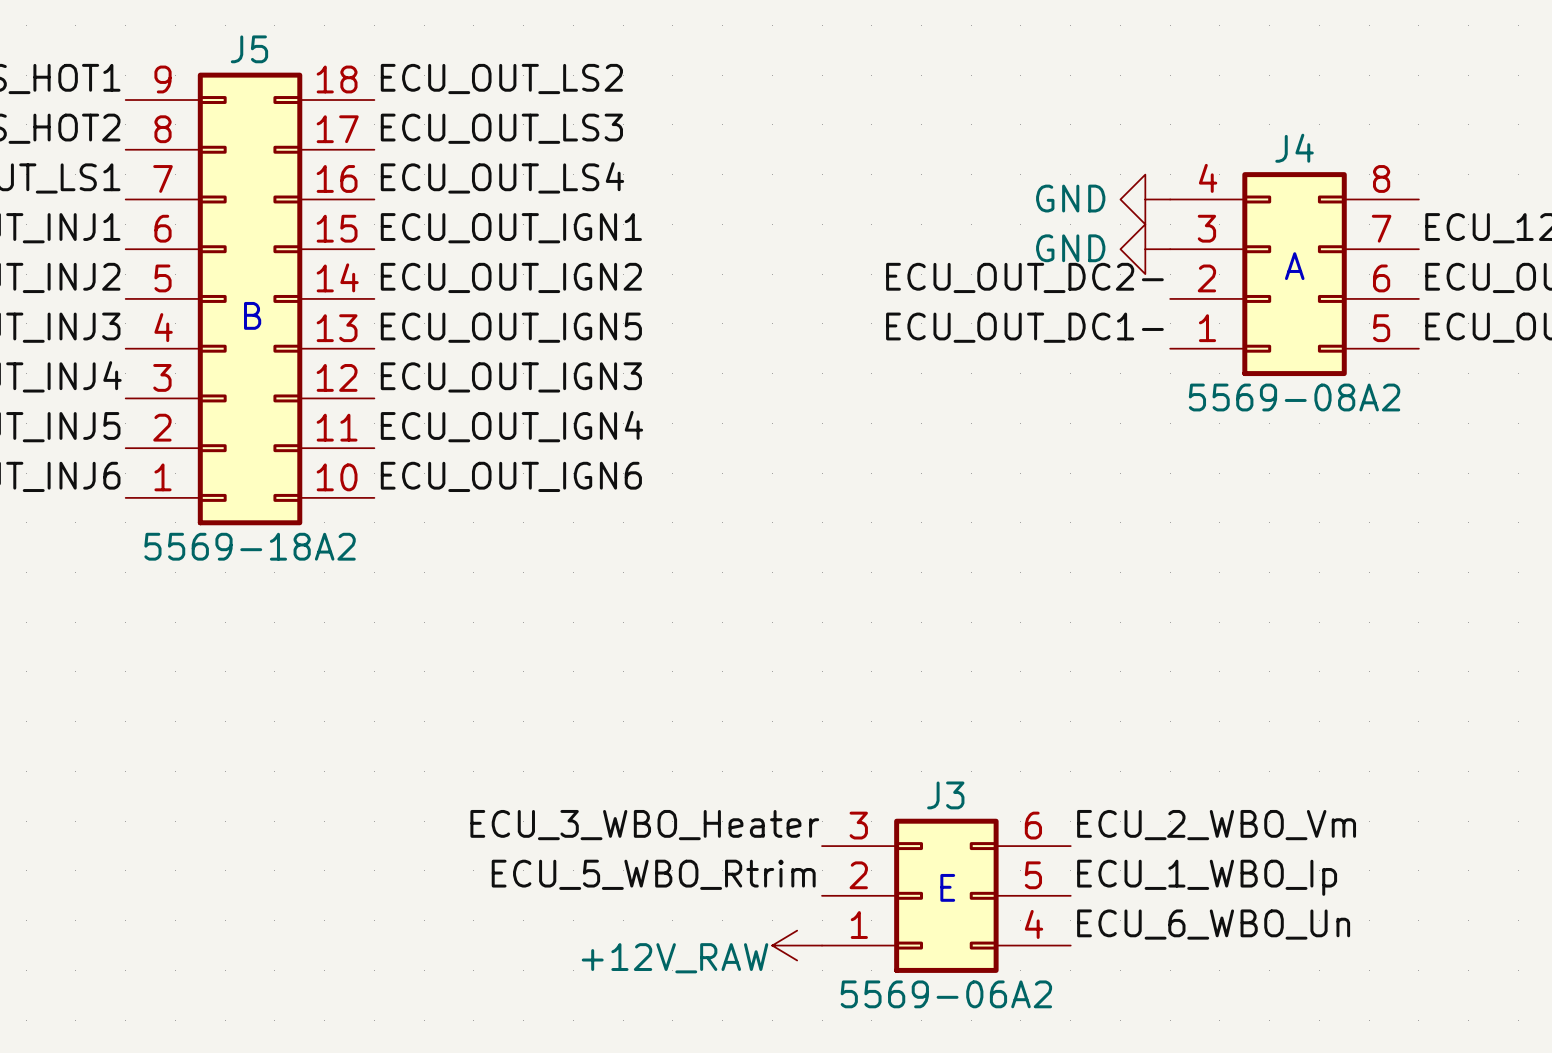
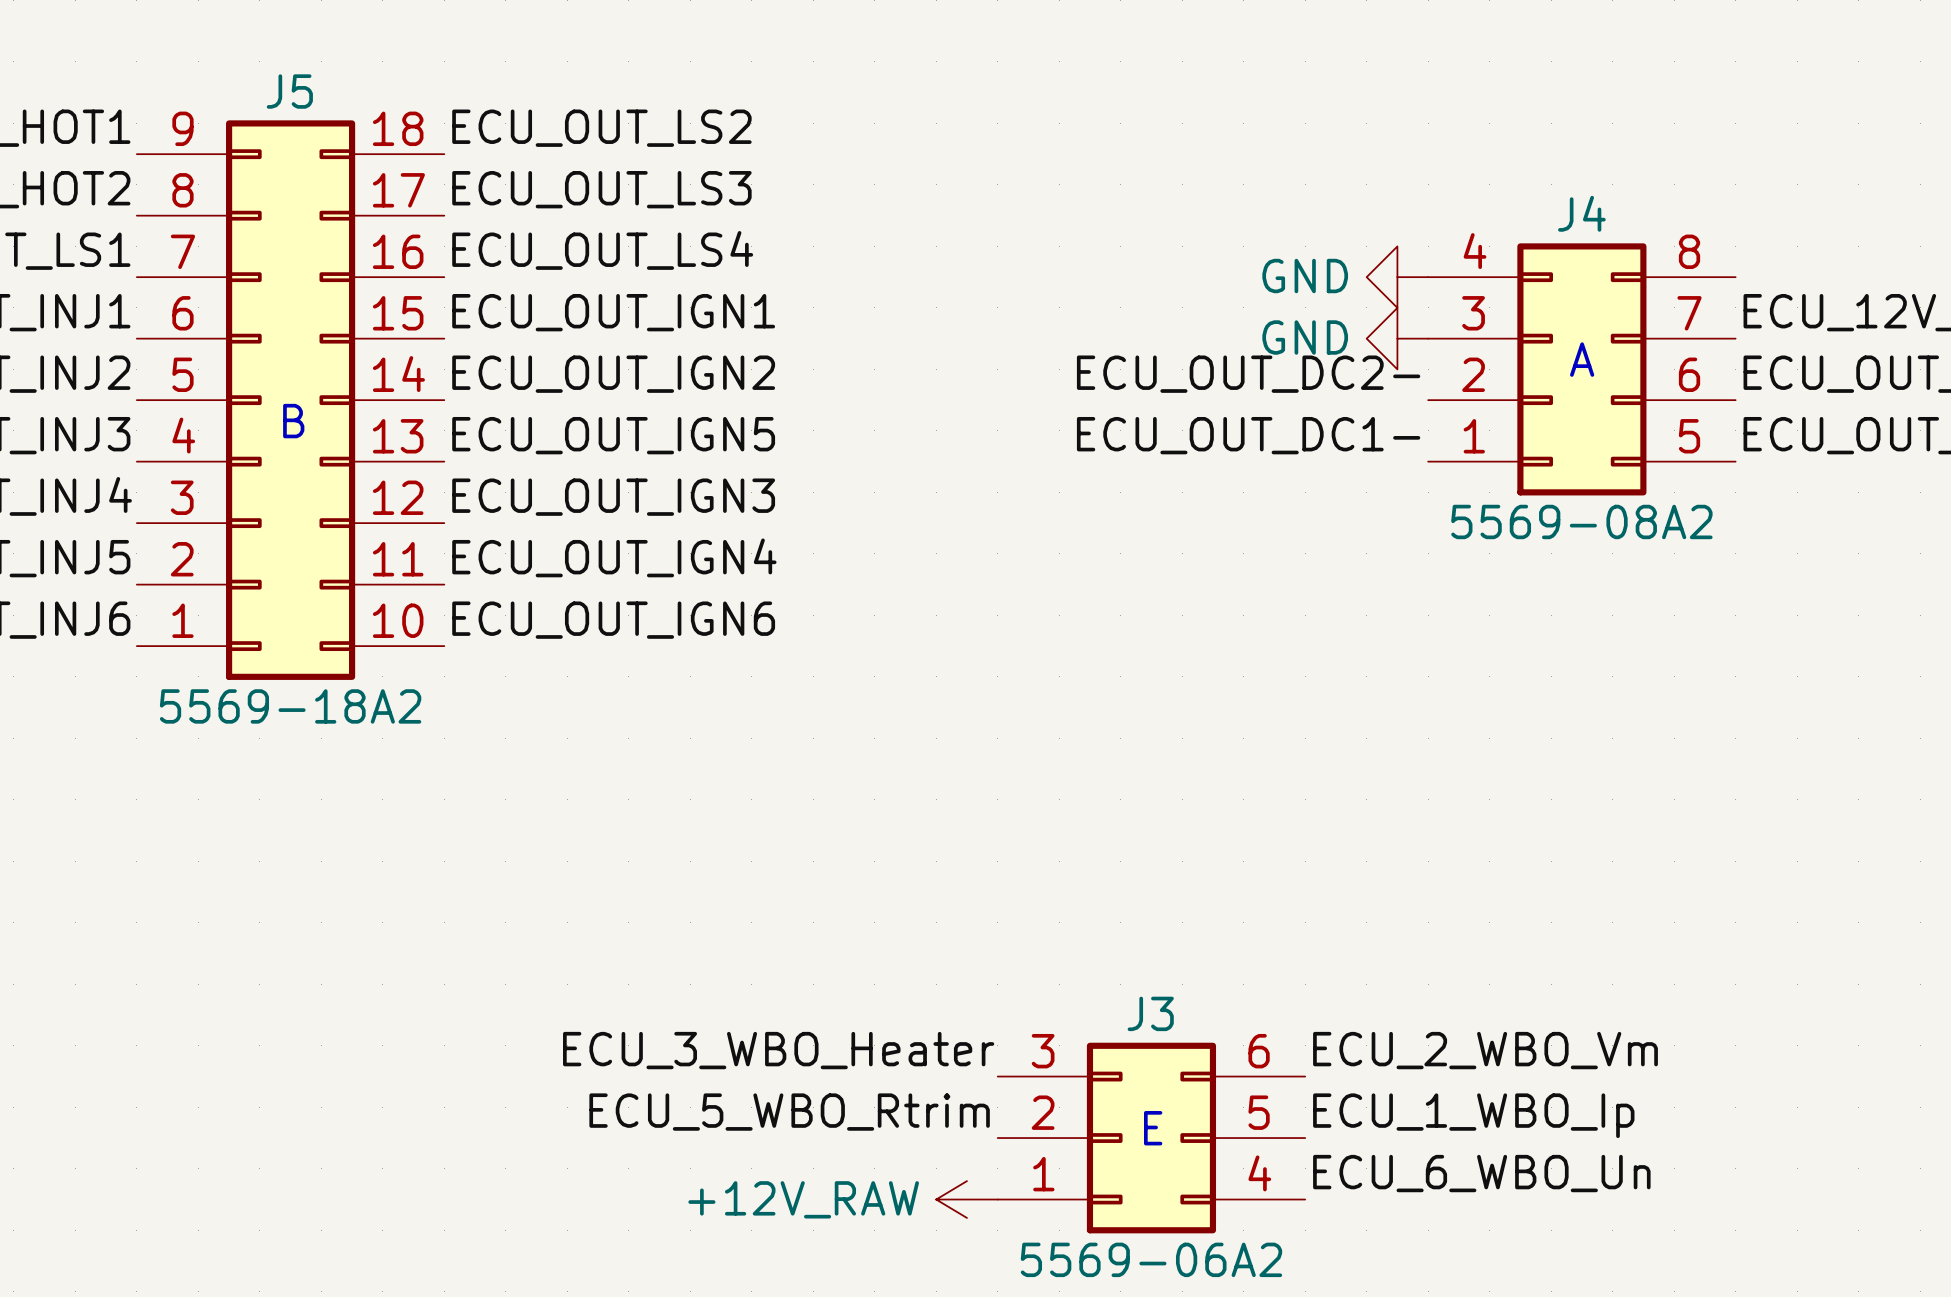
power symbol text position: +12V_RAW (675, 958) -> +12V_RAW (803, 1199)

